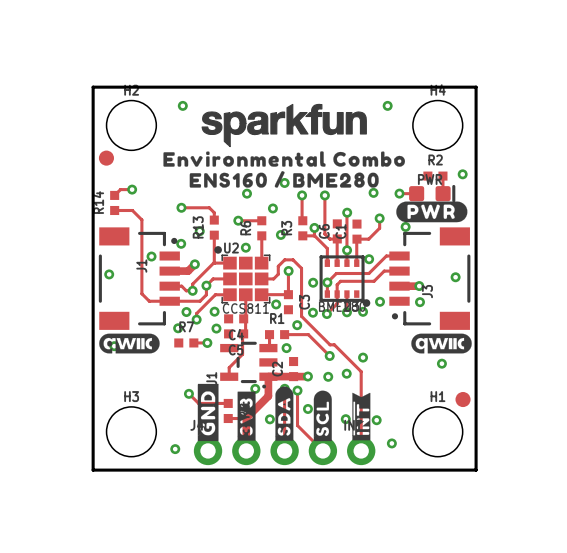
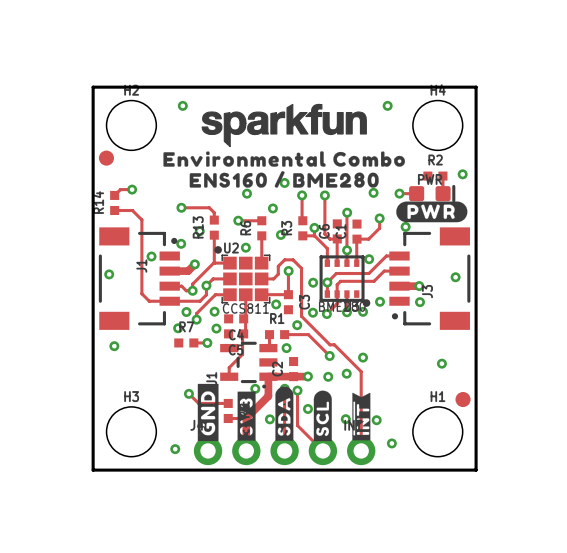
drawing: [99, 333, 160, 354] -> none
drawing: [411, 333, 472, 354] -> none

